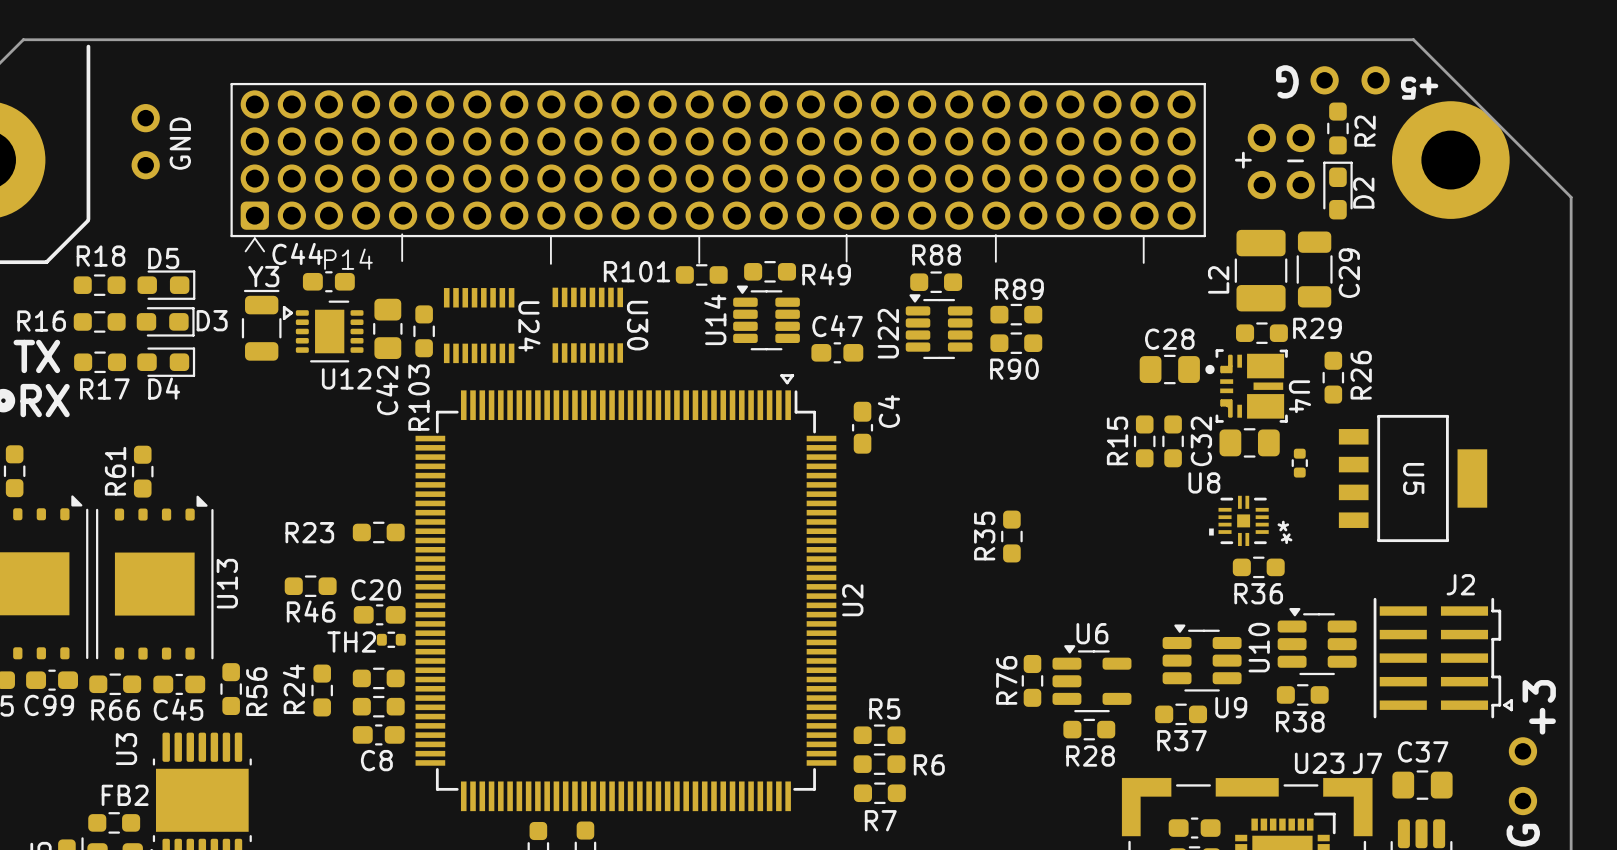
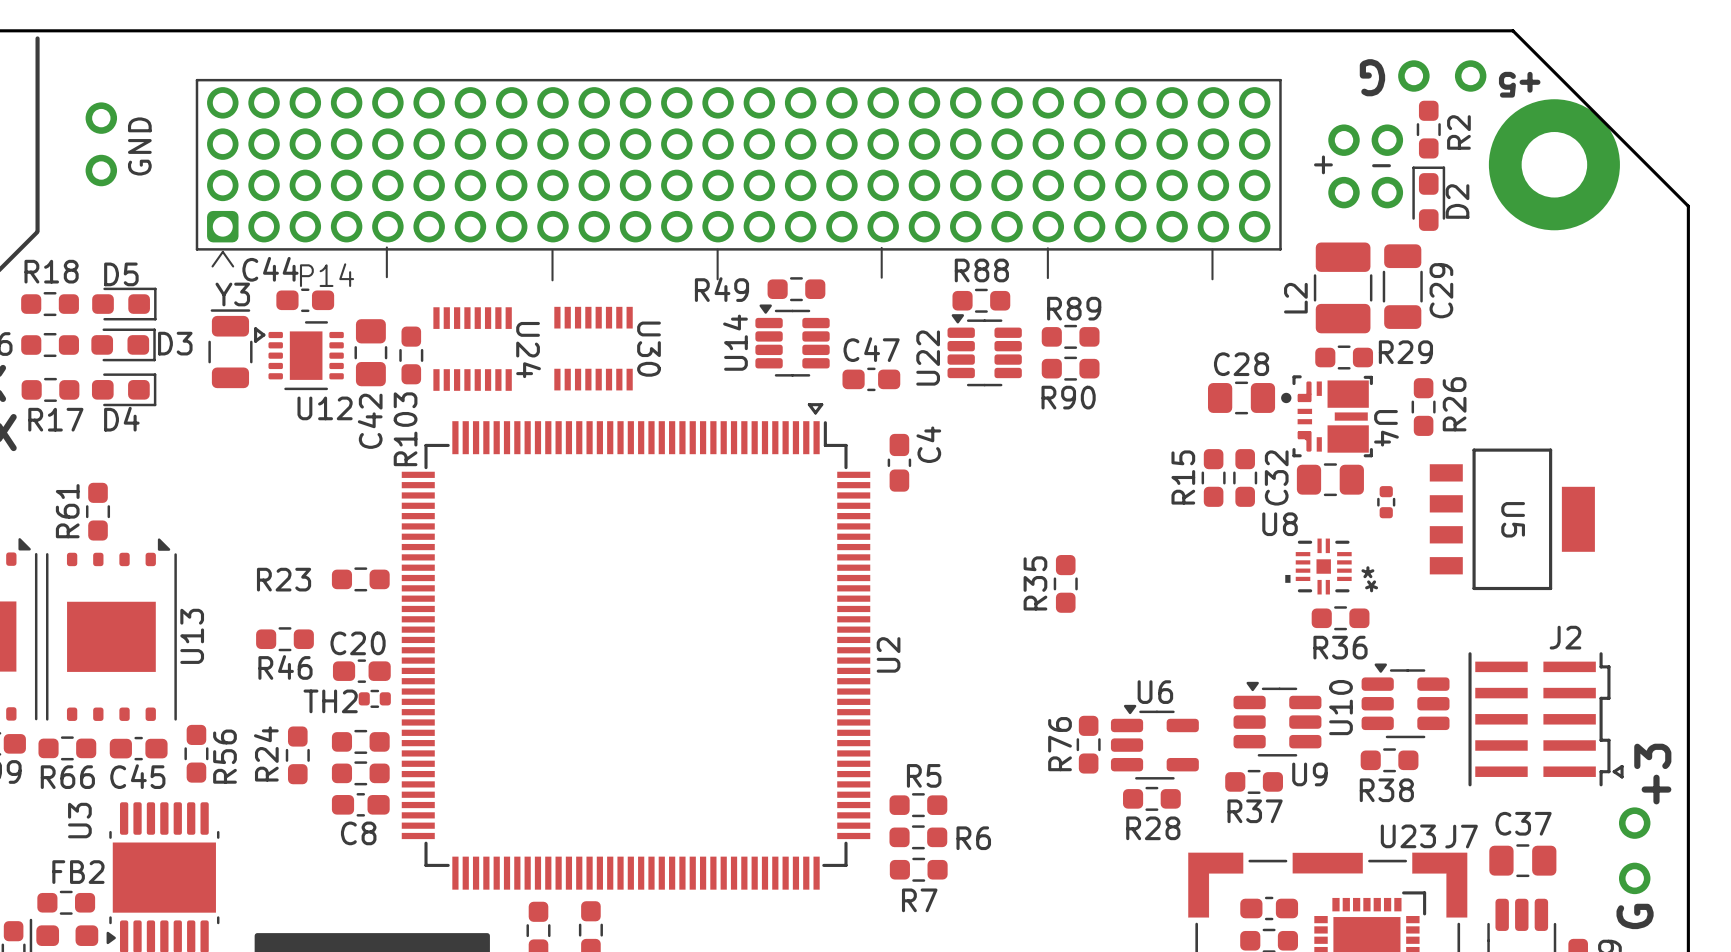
R101: (701, 274) -> none
R49 name position: R49 (826, 274) -> R49 (721, 289)

